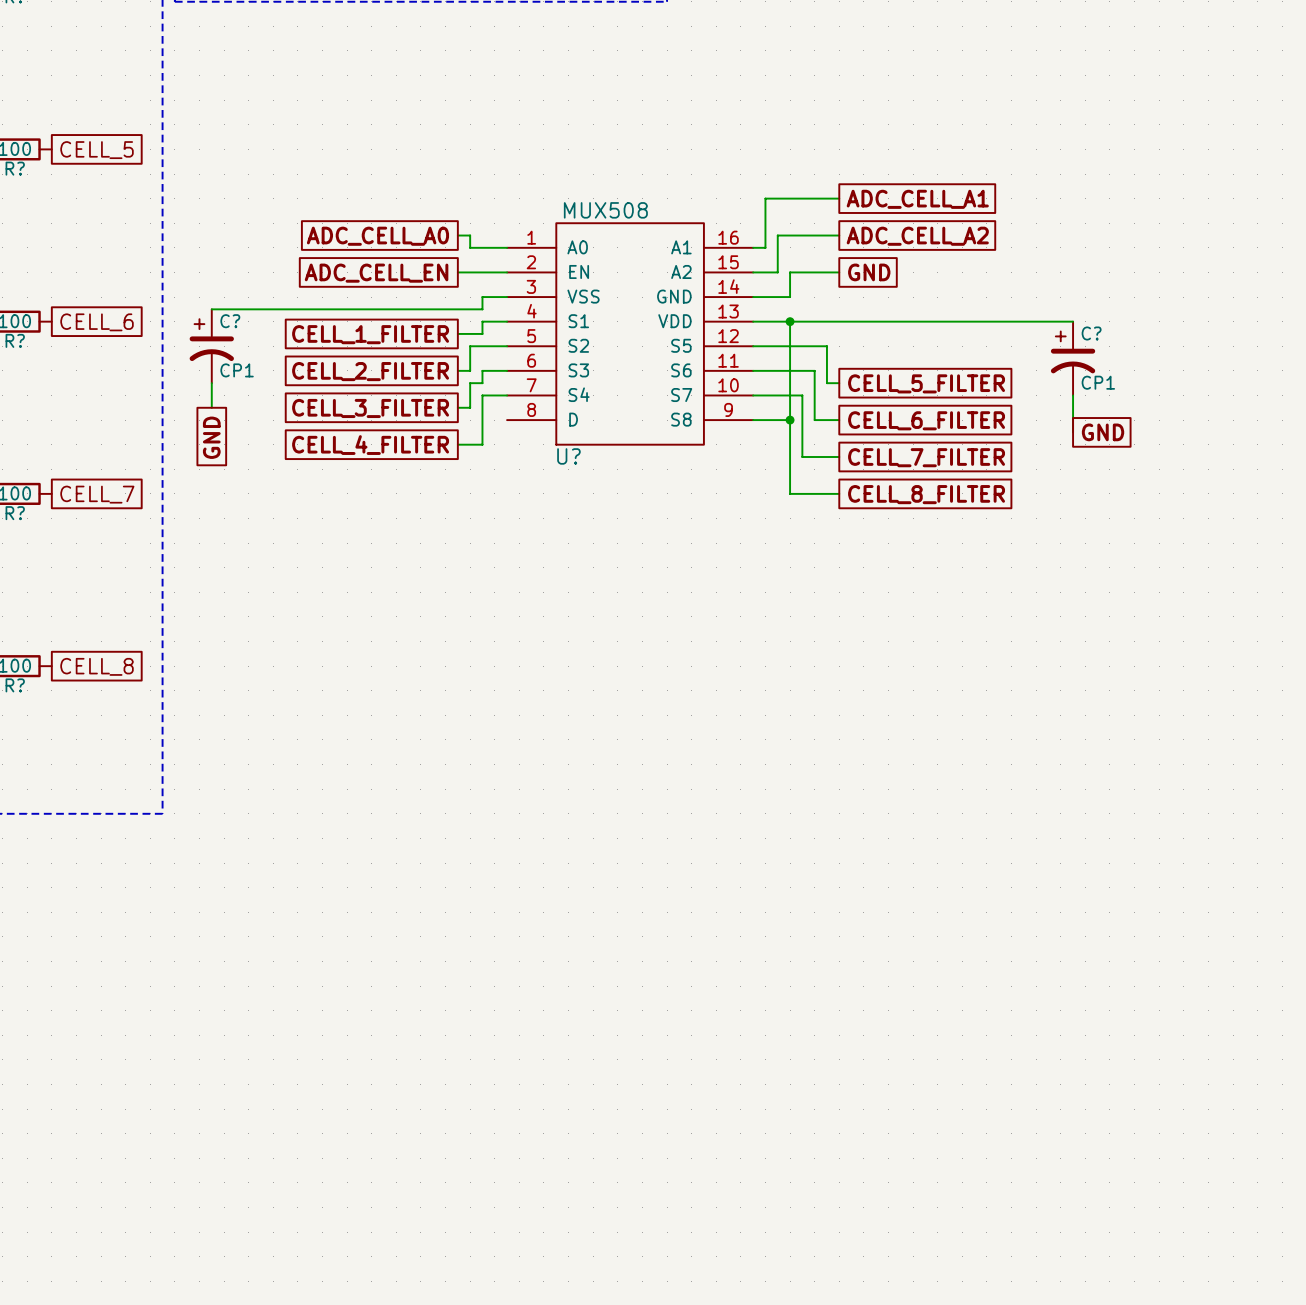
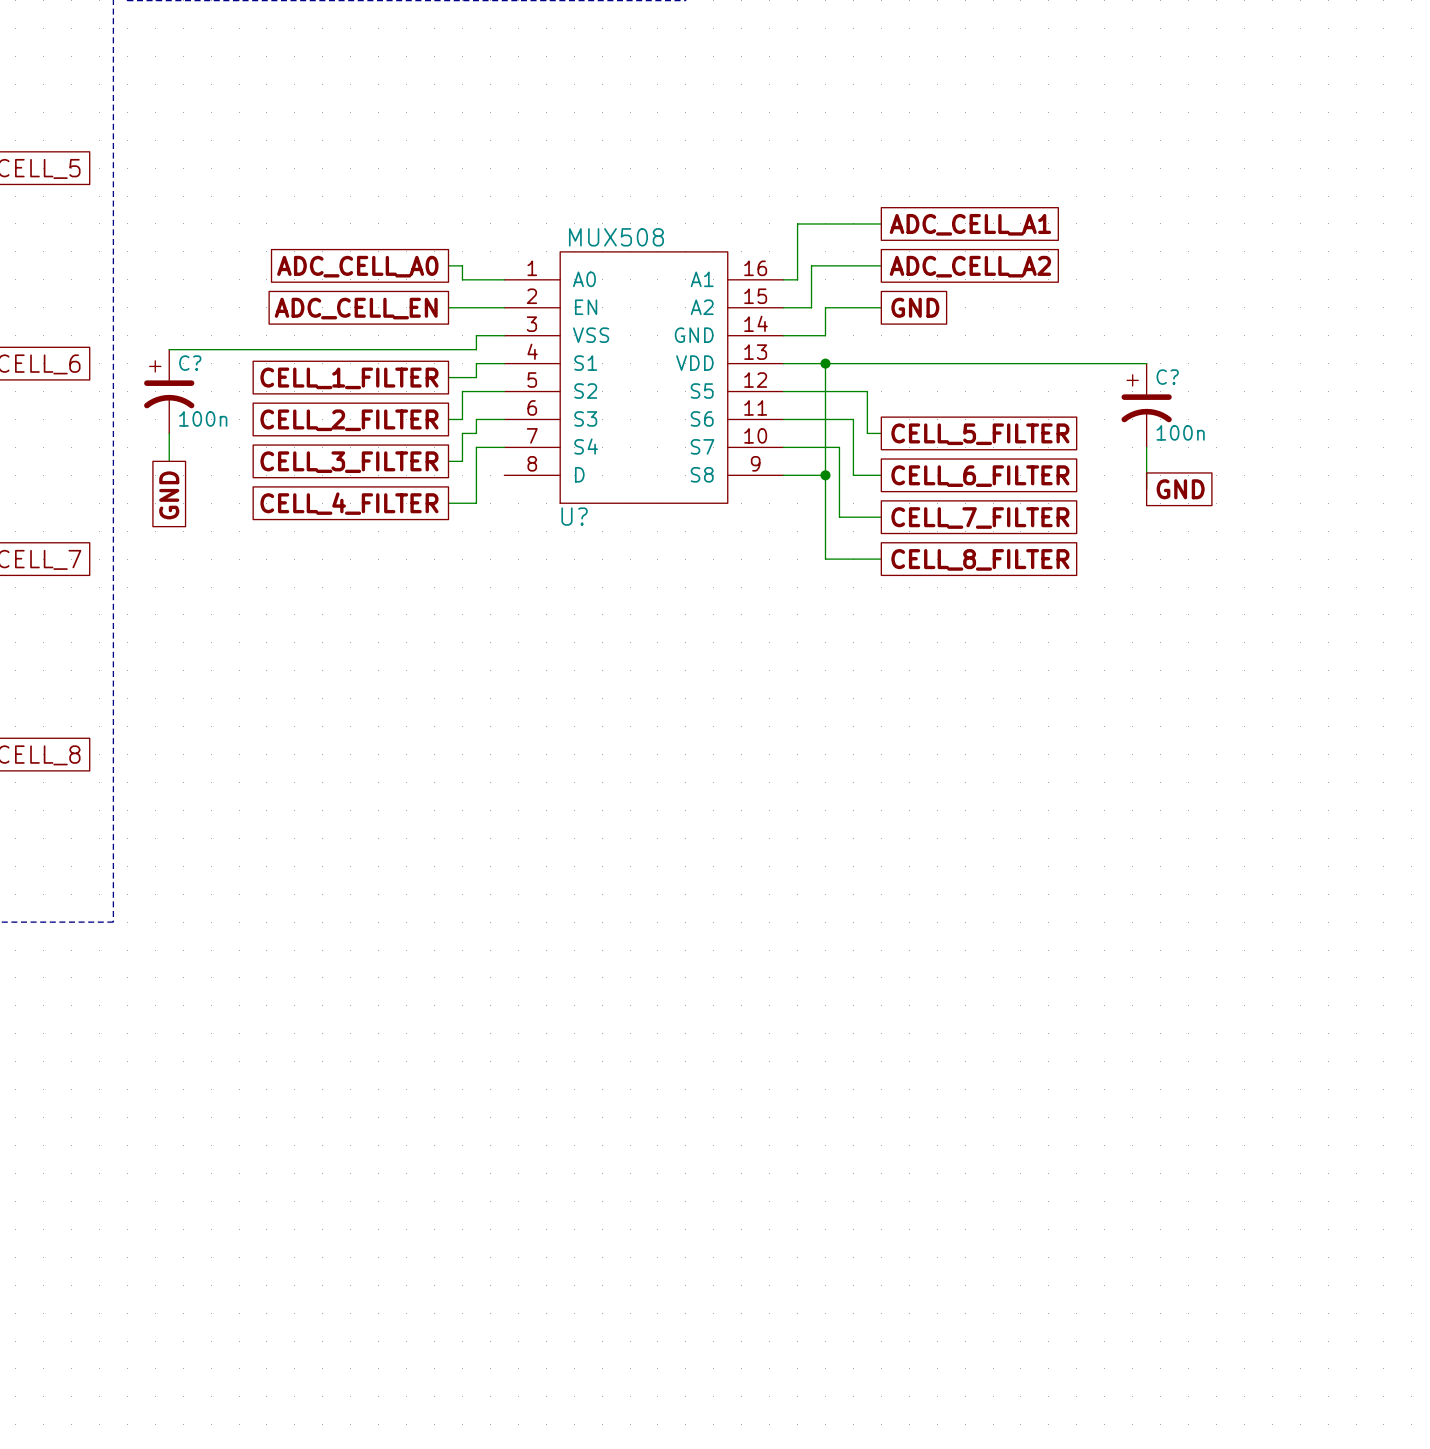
C? value: CP1 (237, 370) -> 100n (203, 418)
C? value: CP1 (1098, 382) -> 100n (1180, 432)

